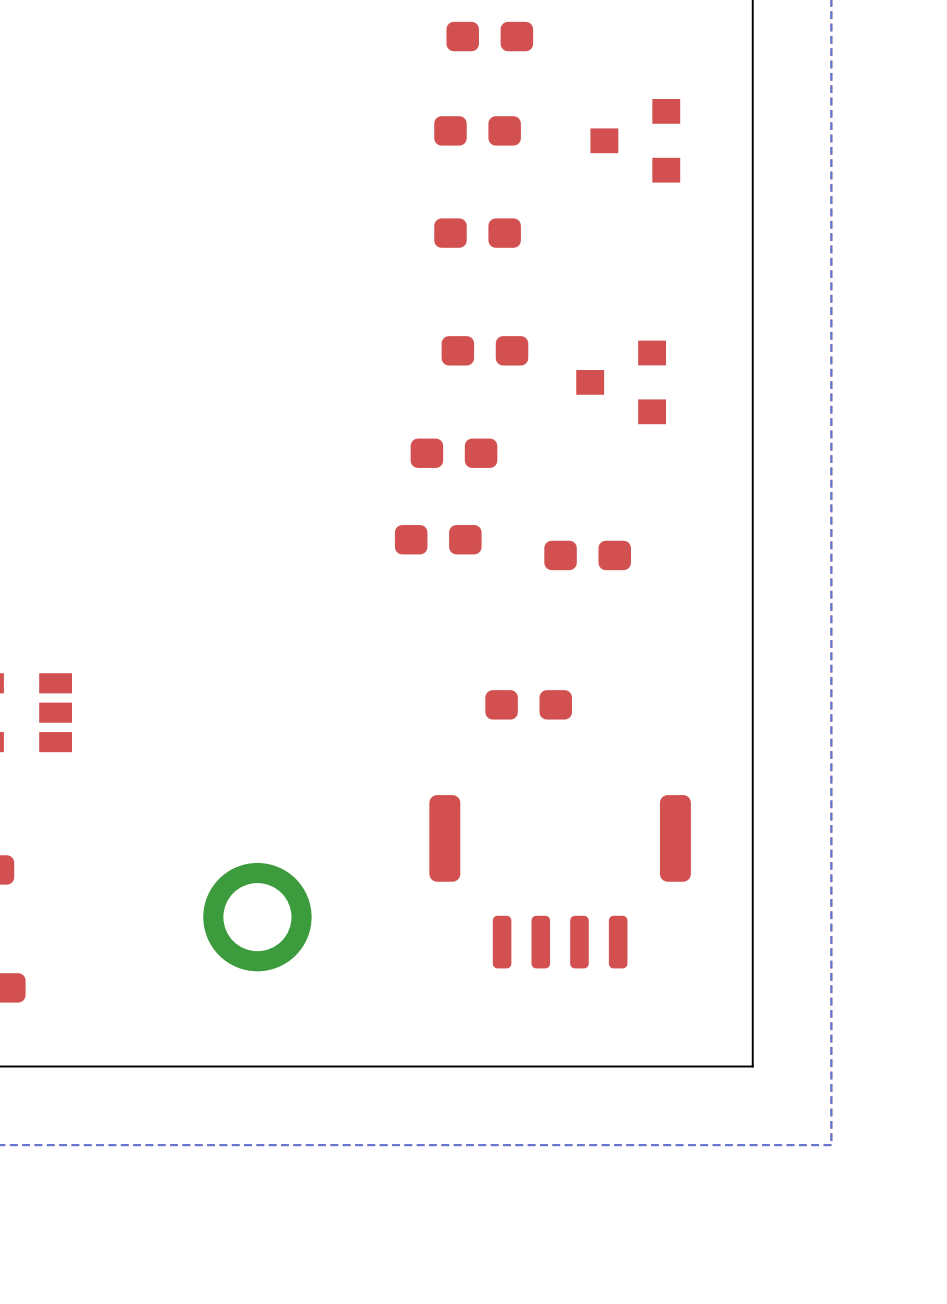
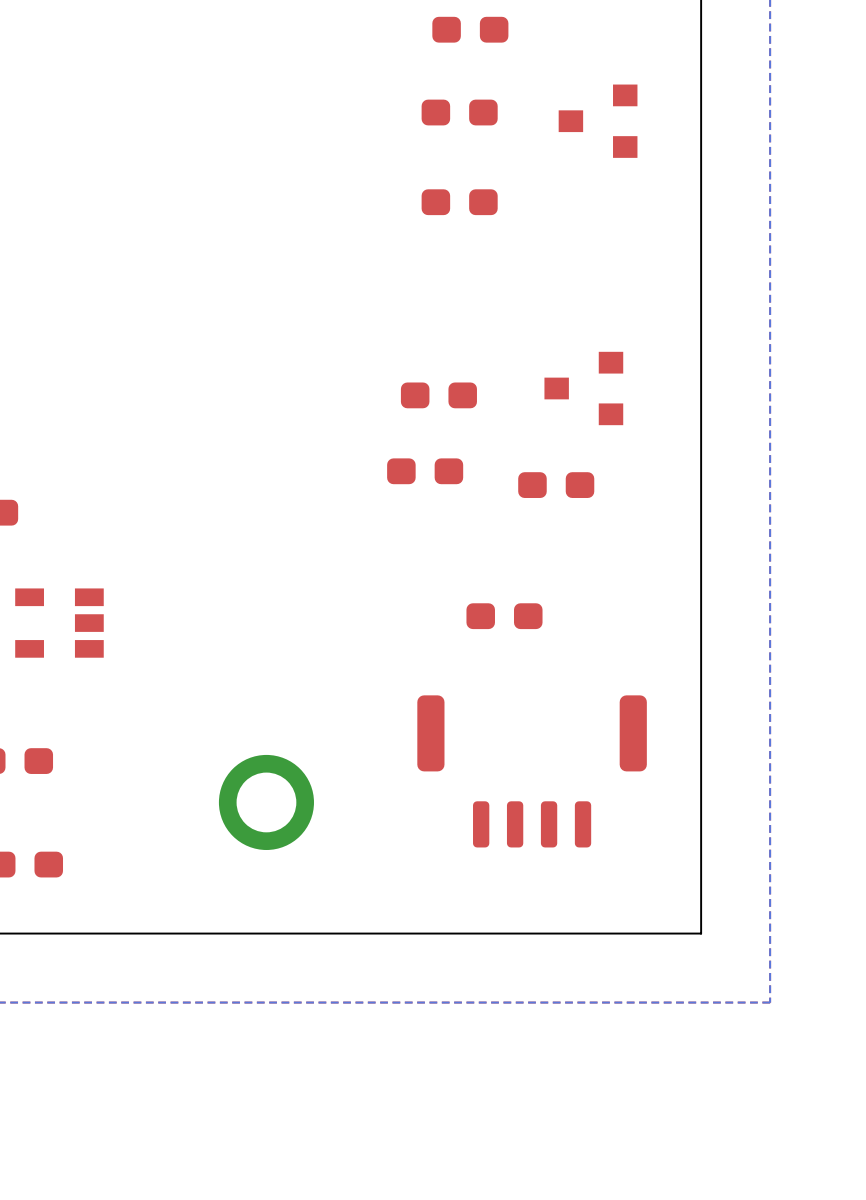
part: (484, 350) -> none
part position: (621, 382) -> (583, 388)

